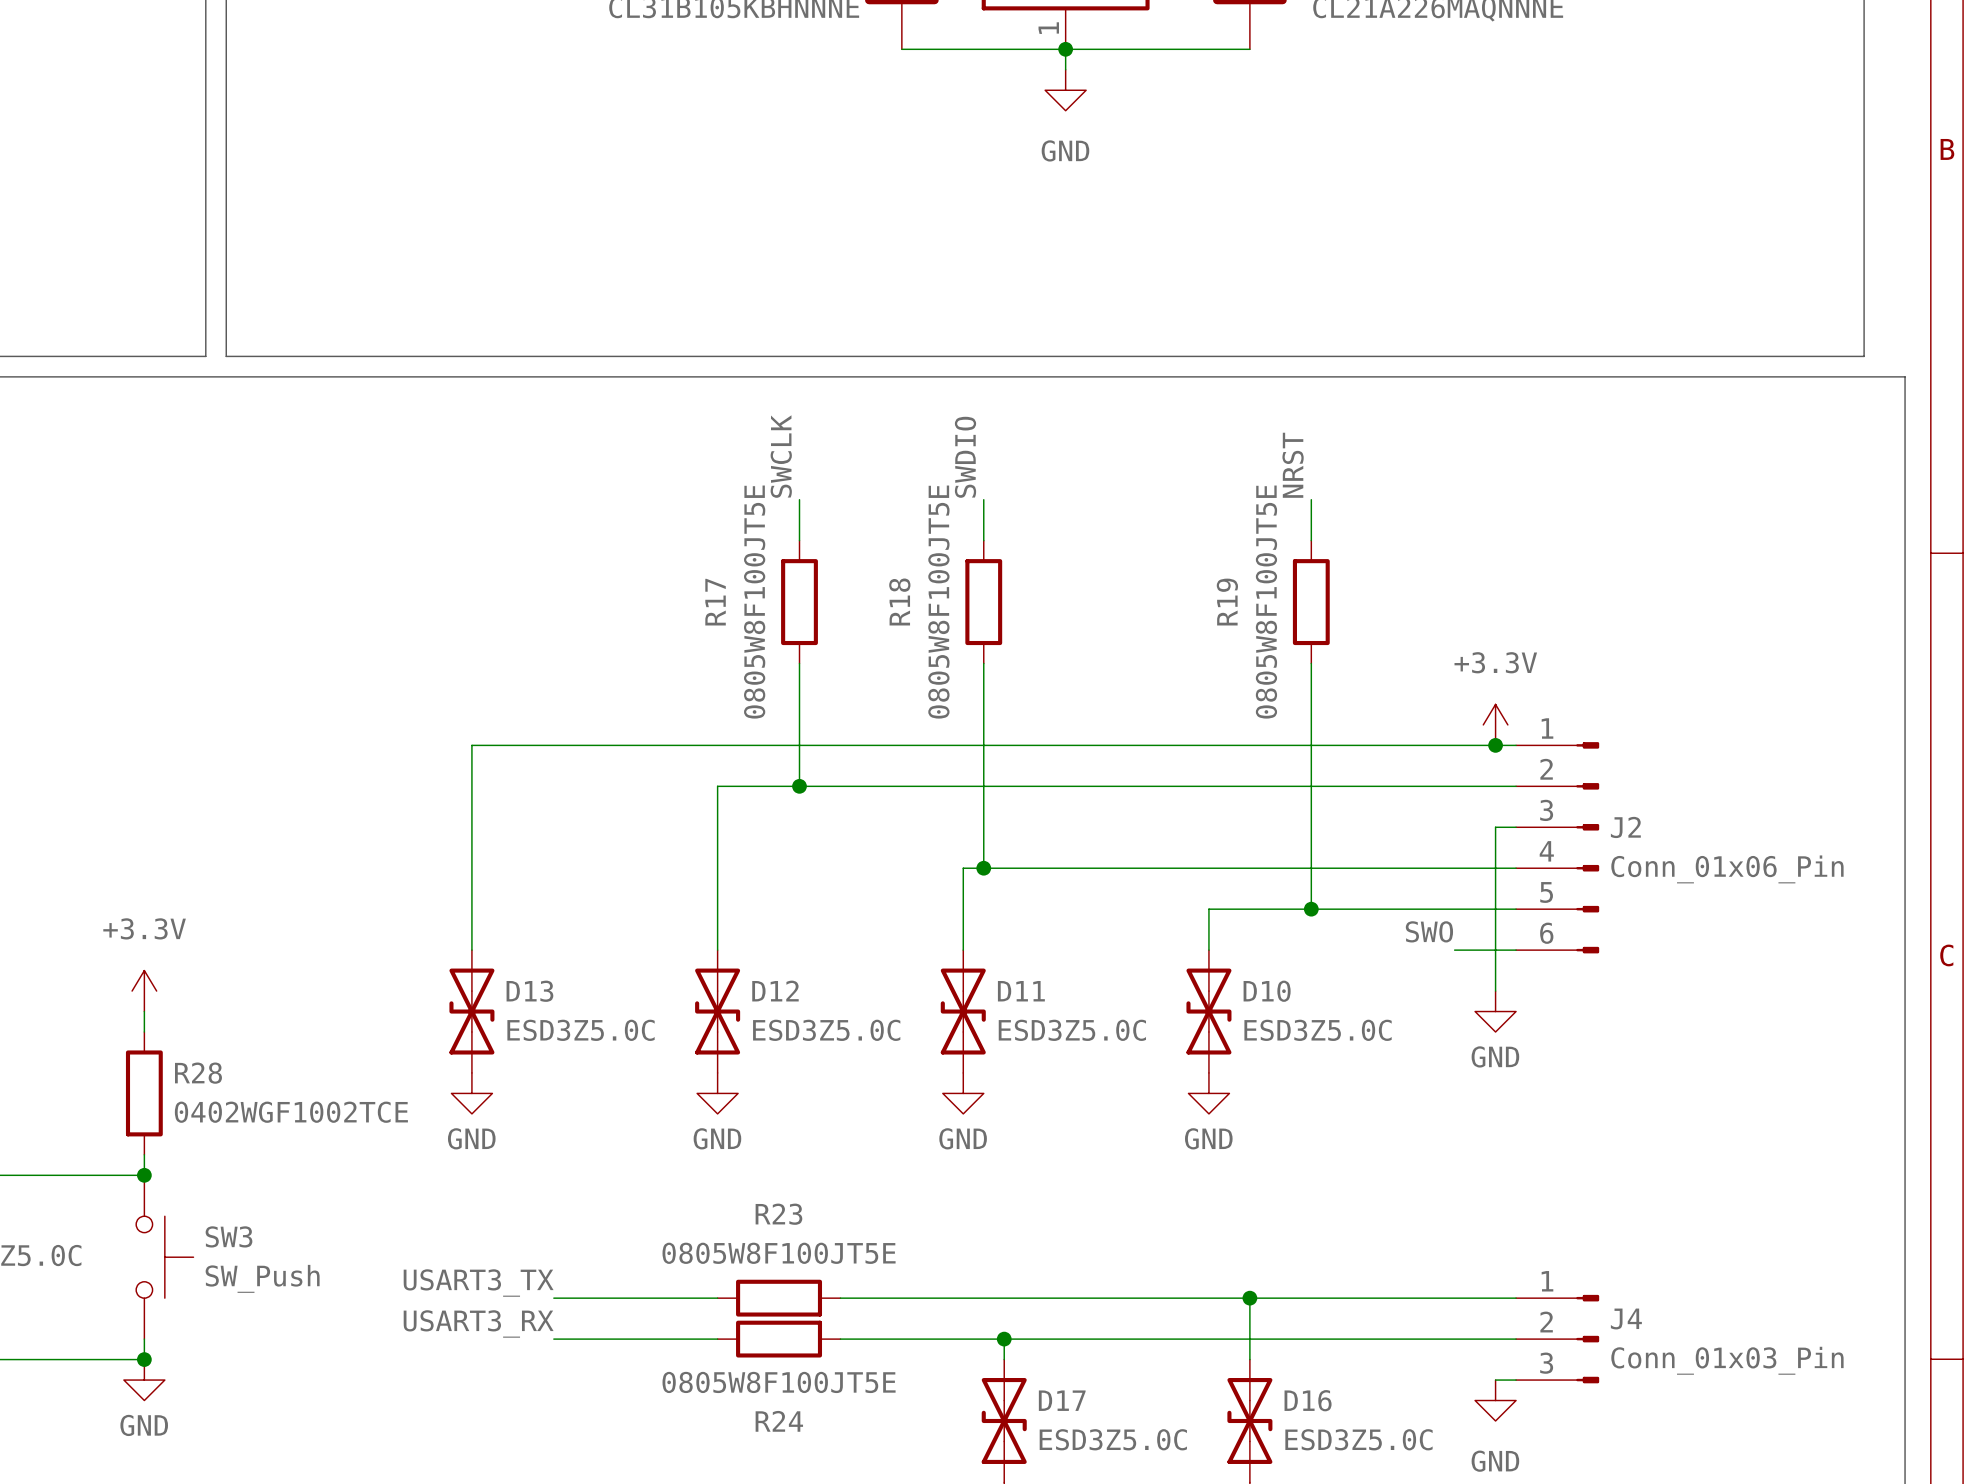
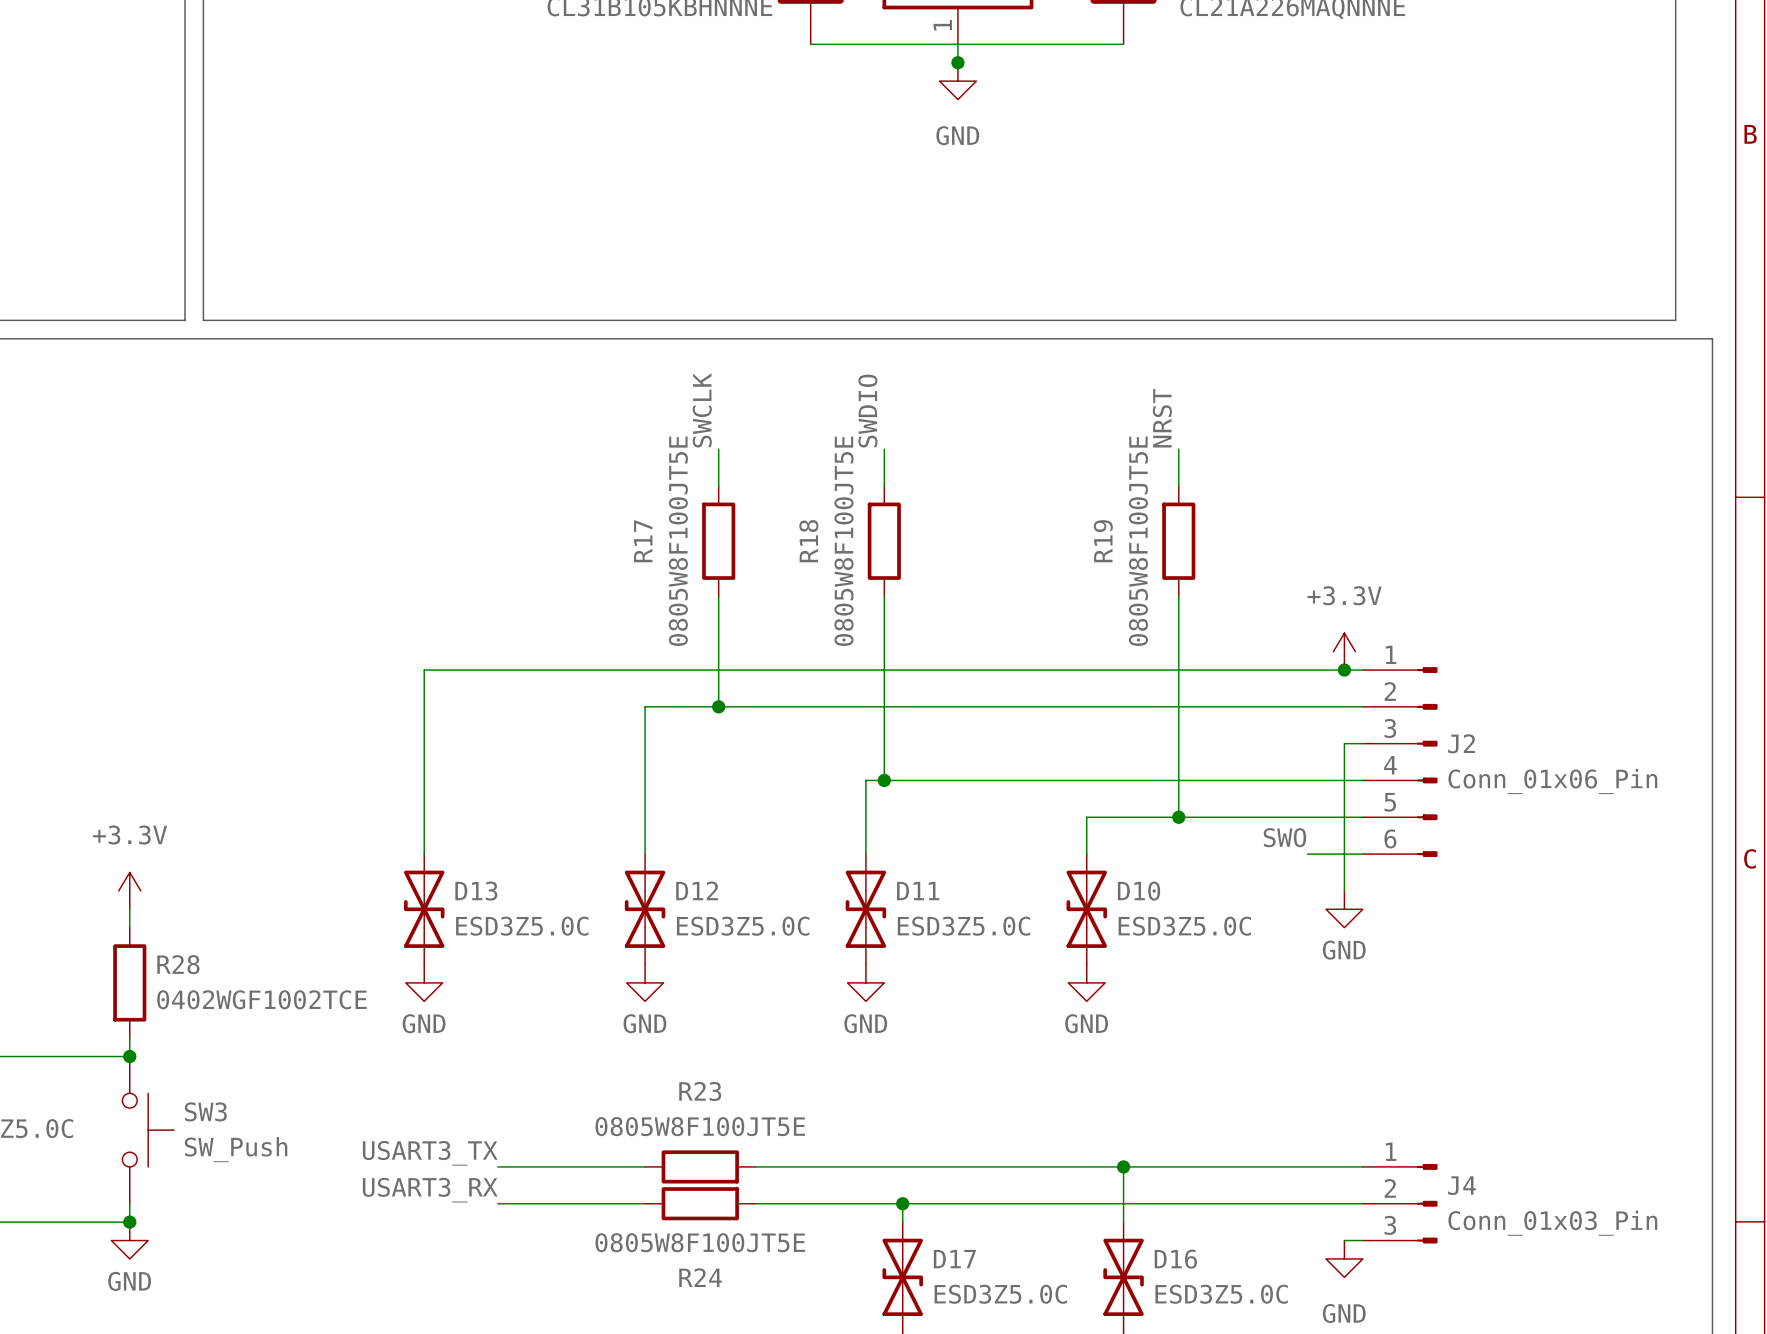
junction position: (1065, 49) -> (957, 62)

